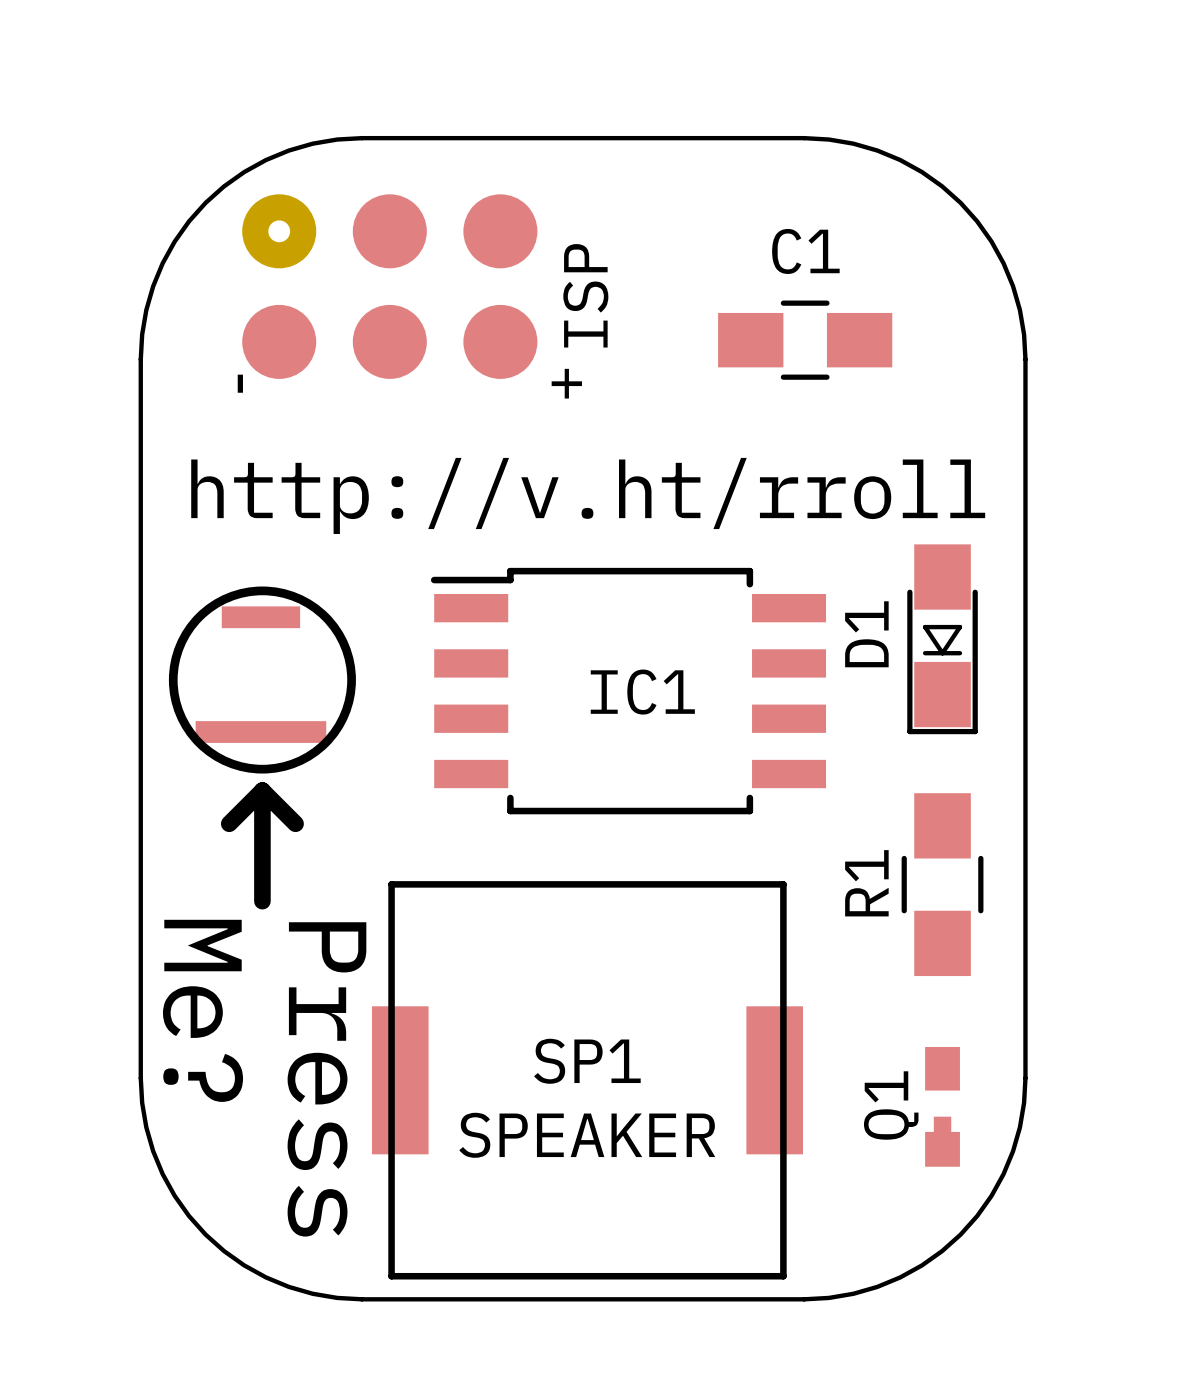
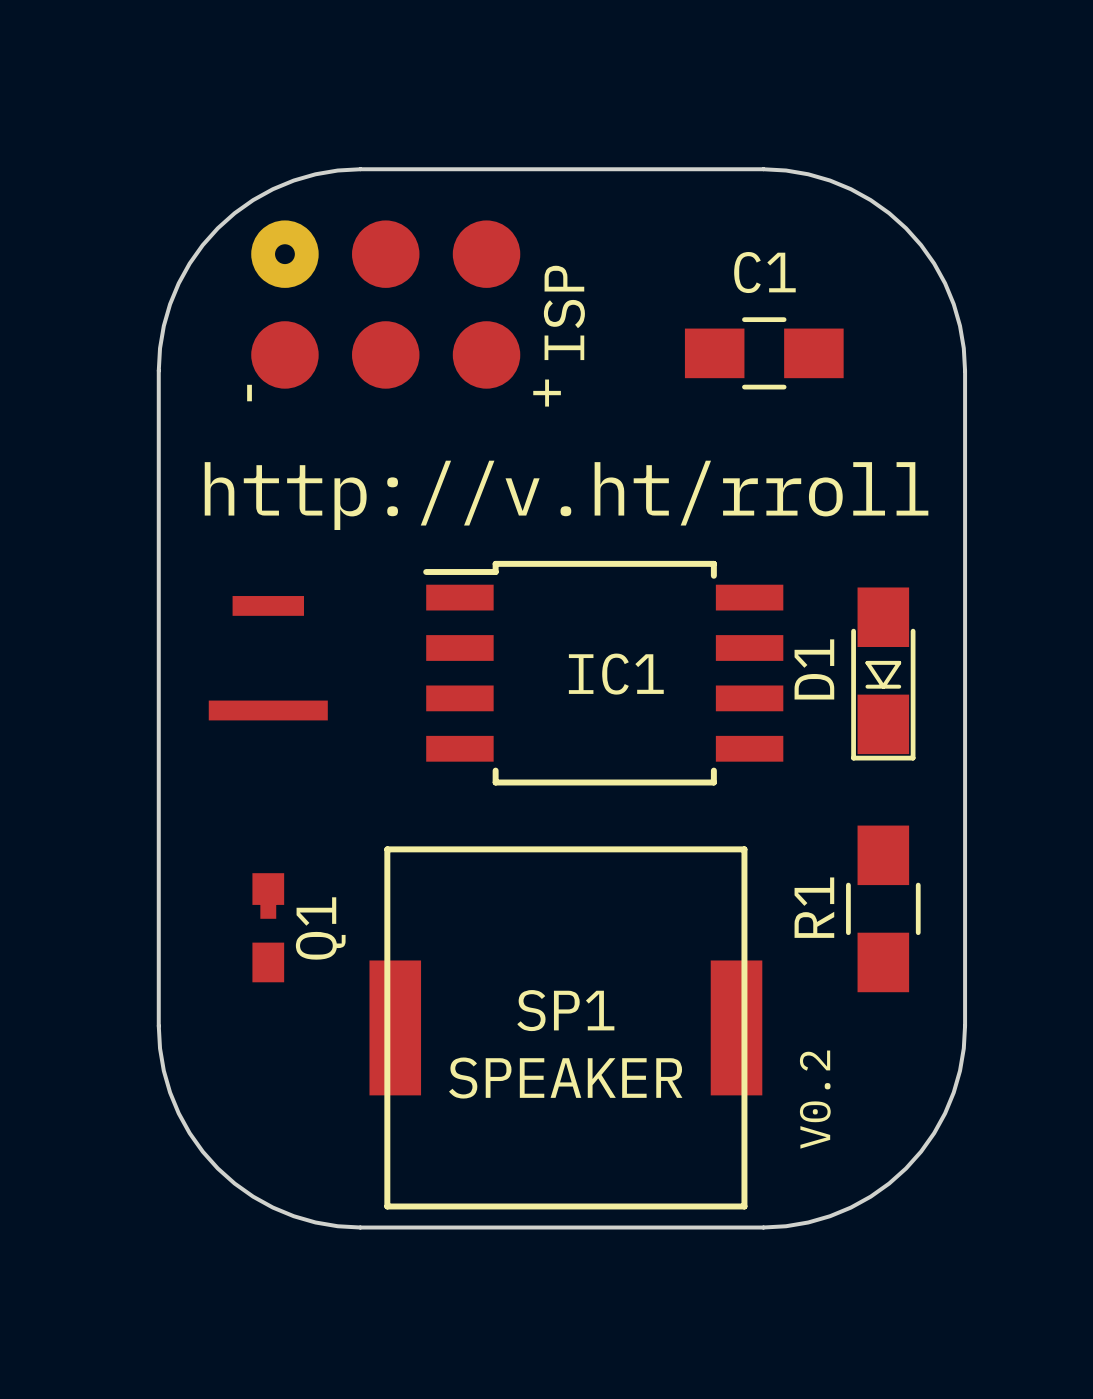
drawing: [168, 586, 356, 774] -> none
D1 position: (942, 639) -> (883, 673)
line: (262, 790) (262, 901) -> none
line: (262, 790) (295, 823) -> none
line: (262, 790) (229, 823) (262, 790) -> none
R1 position: (942, 884) -> (883, 908)
text: Me? (203, 1010) -> none
text: Press (326, 1079) -> none
Q1 rotation: 0° (942, 1106) -> 180° (268, 927)
Q1 position: (942, 1106) -> (268, 927)
text: none -> V0.2 (815, 1099)

